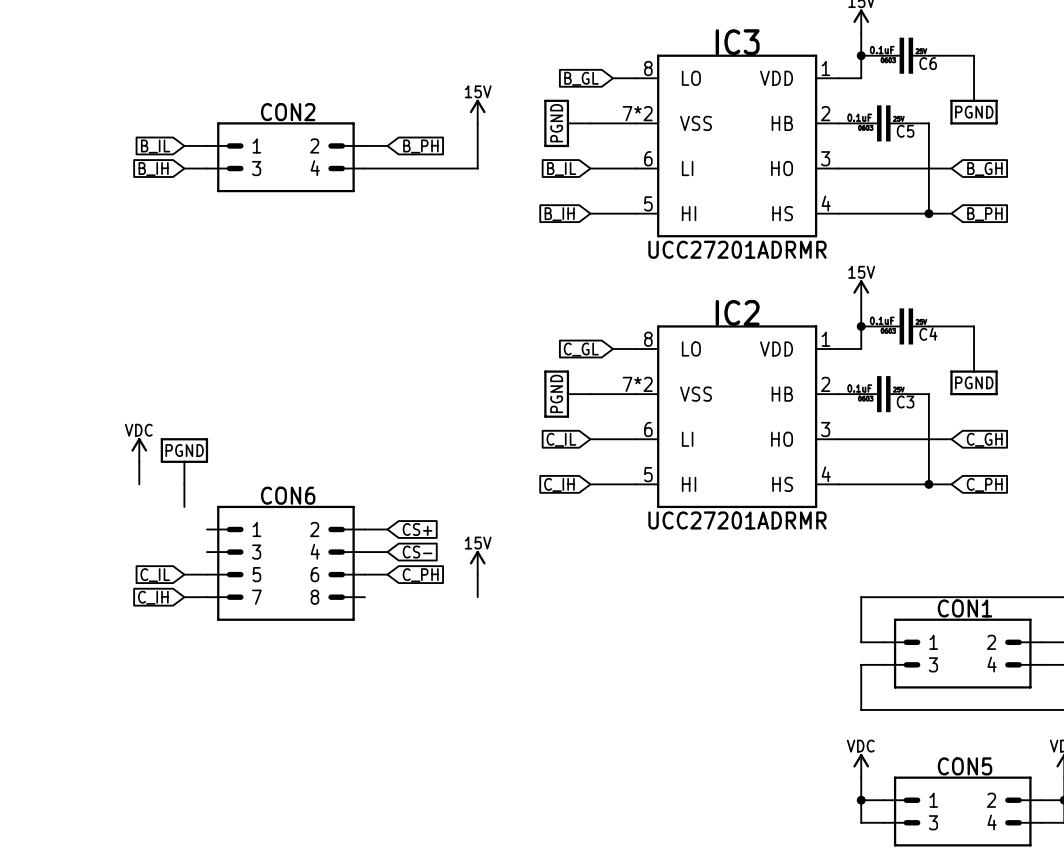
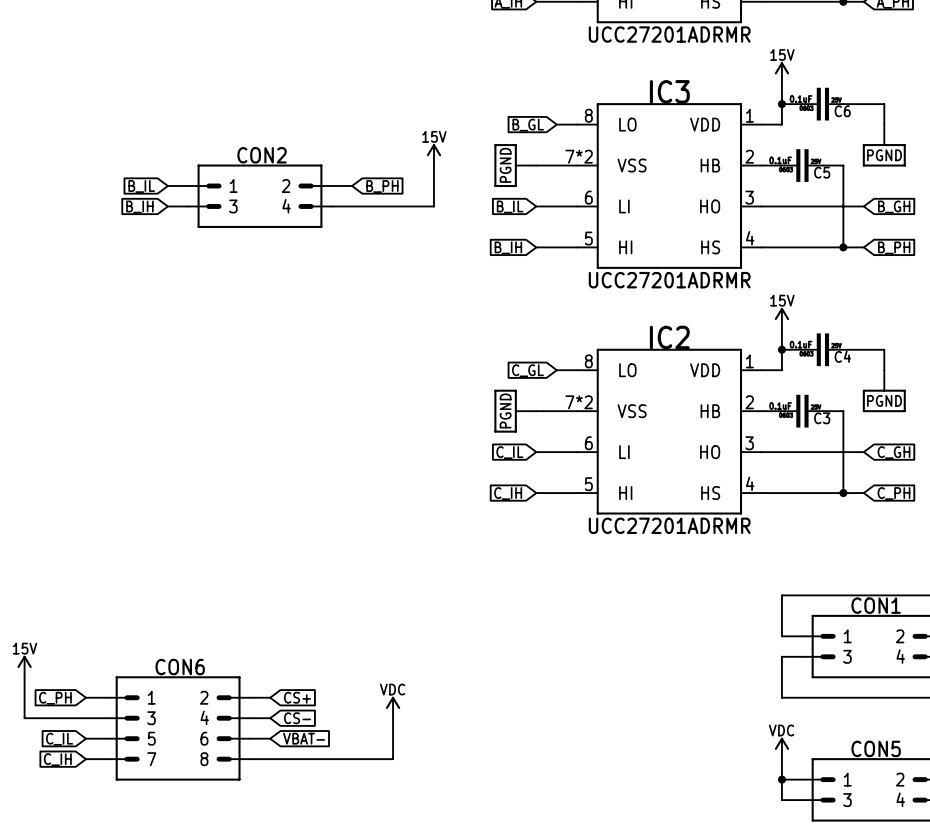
power symbol: VDC (139, 449) -> none
wire: (139, 461) (139, 484) -> none
power symbol: PGND (184, 461) -> none
wire: (184, 484) (184, 506) -> none
wire: (364, 529) (387, 529) -> (249, 697) (270, 697)
global label position: CS+ (417, 529) -> CS+ (297, 697)
wire: (364, 552) (387, 552) -> (249, 718) (270, 718)
global label position: CS- (417, 552) -> CS- (297, 718)
power symbol: 15V (477, 562) -> none
CON6 position: (285, 563) -> (178, 728)
wire: (184, 574) (206, 574) -> (85, 738) (106, 738)
wire: (364, 574) (387, 574) -> (249, 738) (270, 738)
wire: (477, 574) (477, 597) -> none
global label position: C_IL (155, 575) -> C_IL (59, 739)
global label: C_PH (420, 575) -> none
global label position: C_IH (153, 597) -> C_IH (57, 759)
wire: (184, 597) (206, 597) -> (85, 759) (106, 759)
power symbol: none -> 15V (24, 666)
wire: none -> (24, 677) (24, 718) (106, 718)
wire: none -> (85, 697) (106, 697)
global label: none -> C_PH (55, 698)
power symbol: none -> VDC (393, 707)
wire: none -> (393, 718) (393, 759) (249, 759)
global label: none -> VBAT- (304, 738)

